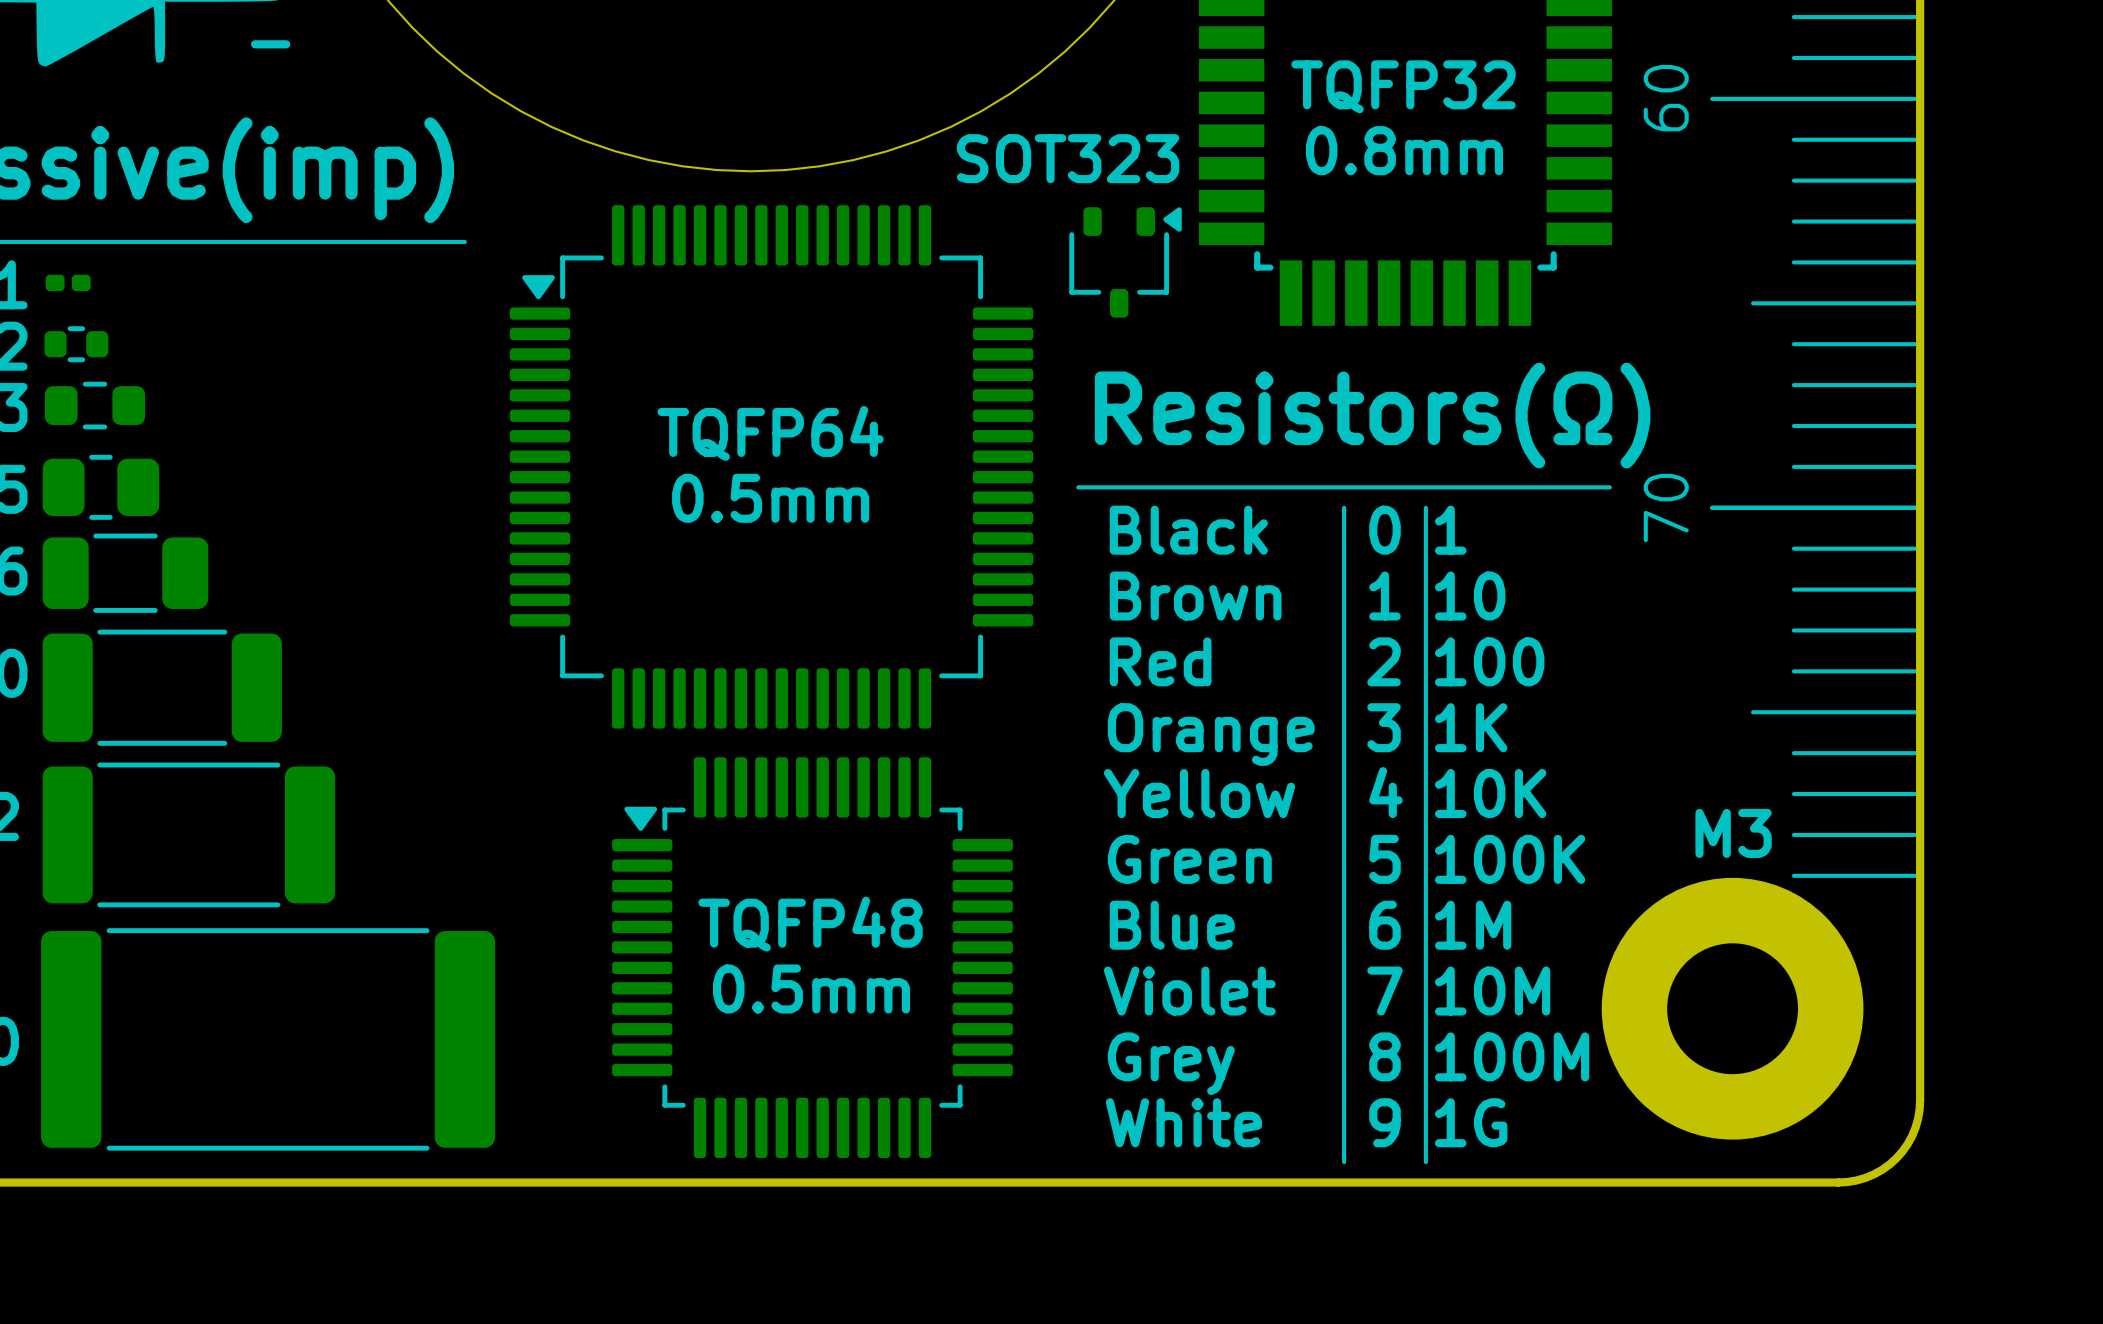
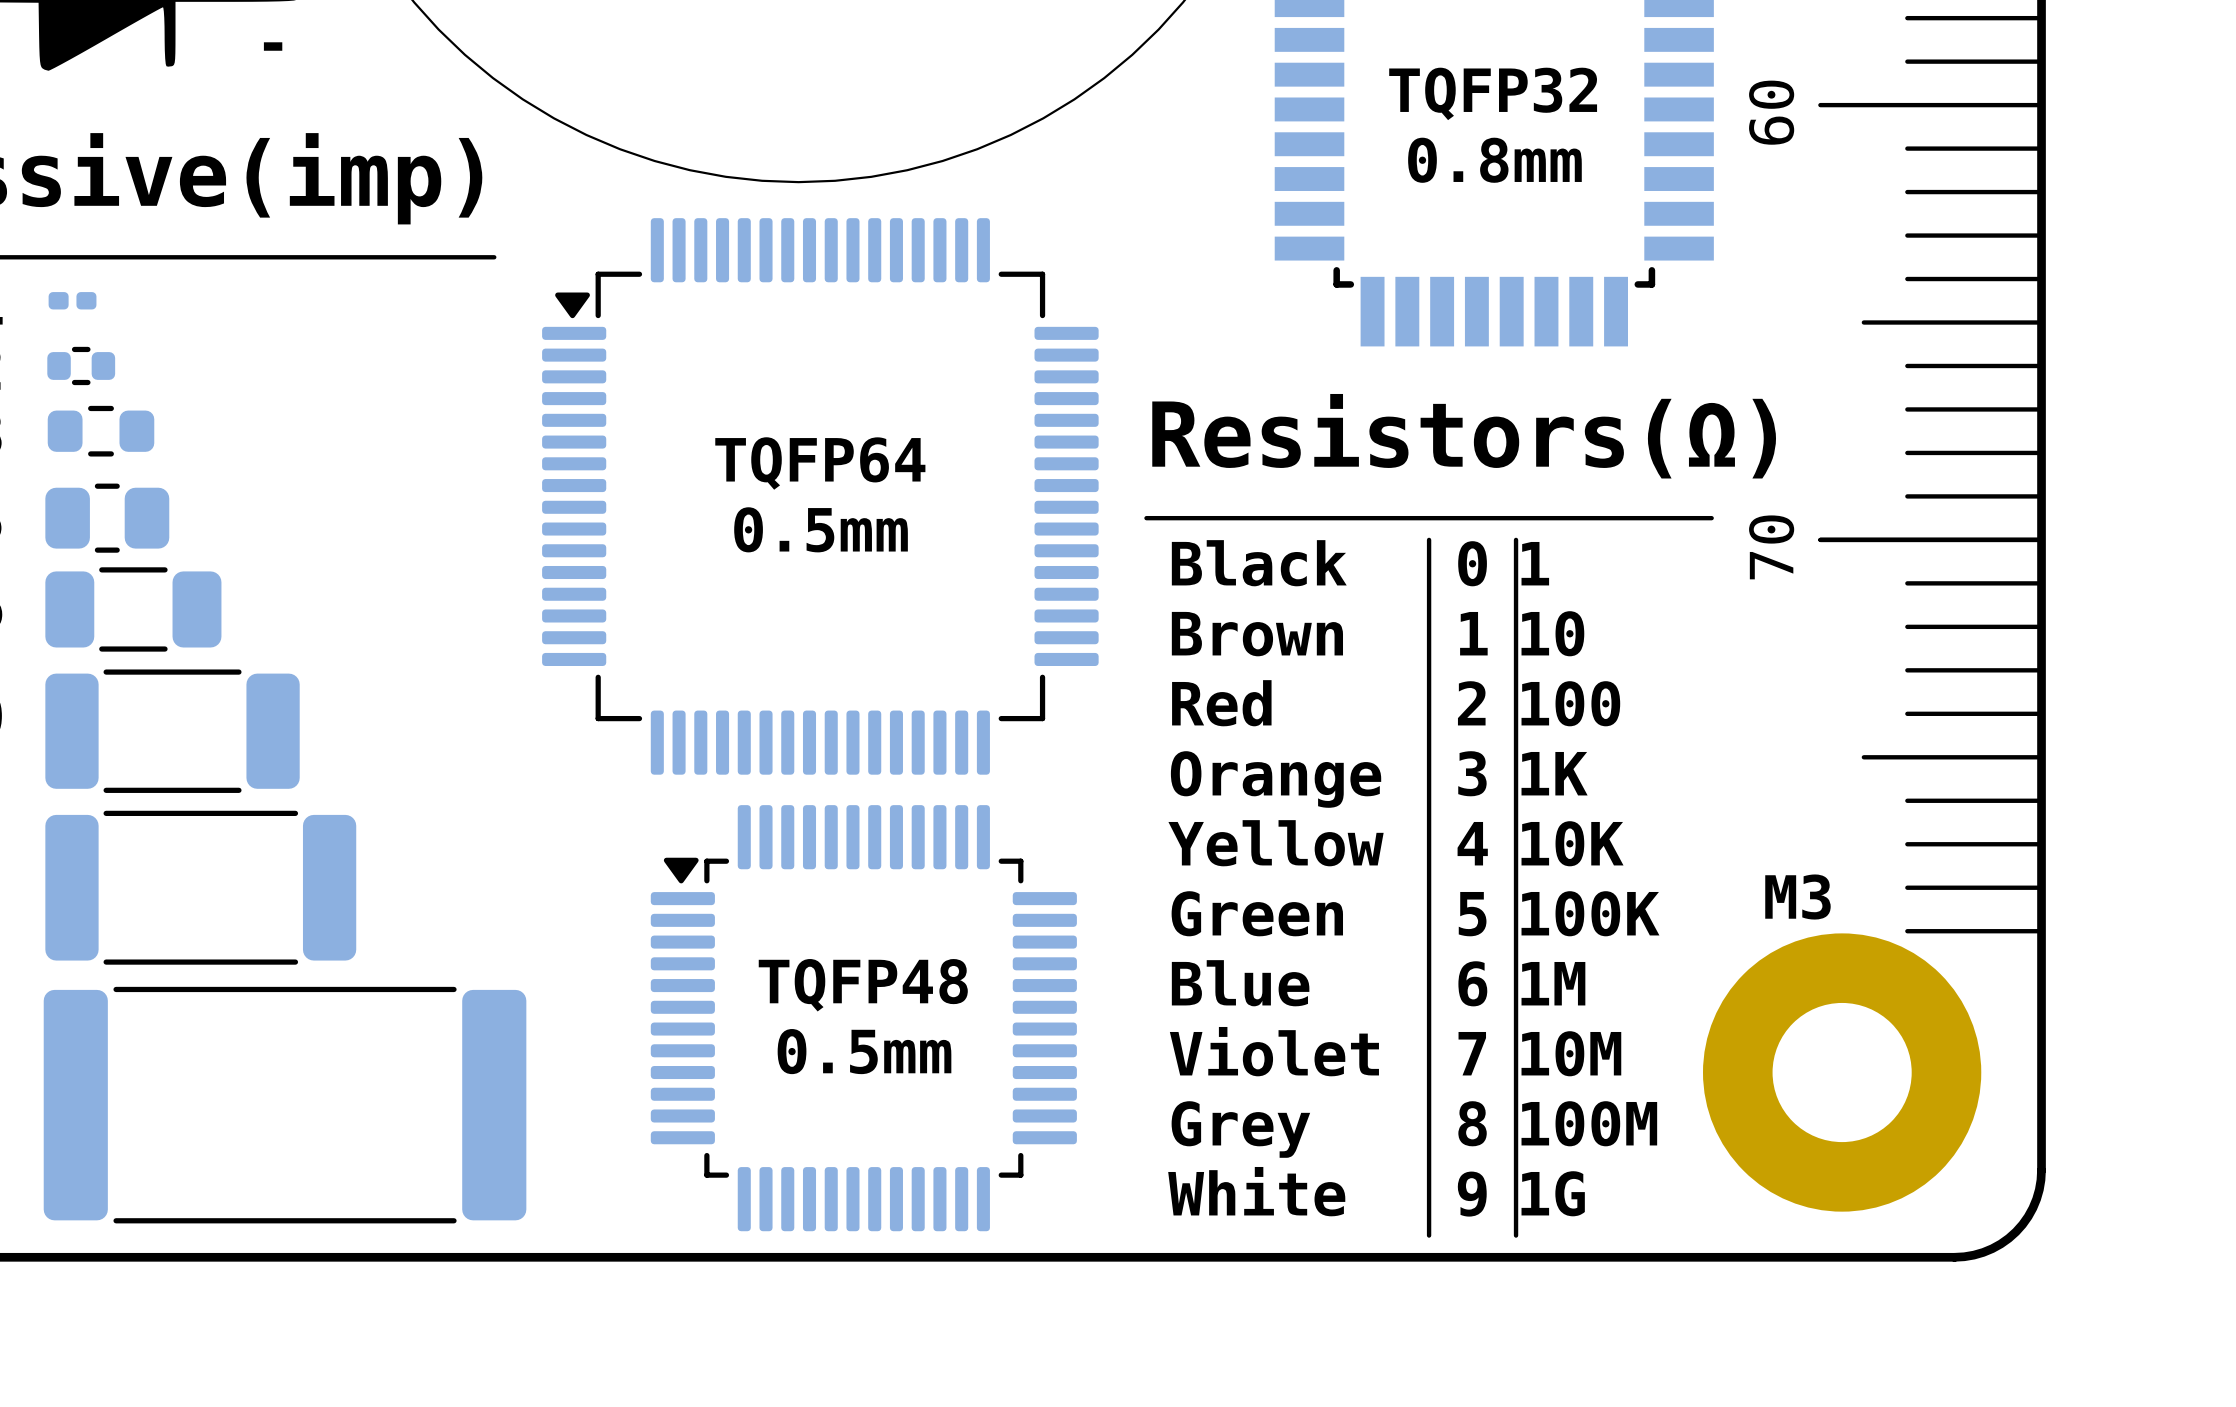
text: SOT323 (1068, 158) -> none
part: (1125, 262) -> none
text position: M3 (1733, 833) -> M3 (1797, 897)

